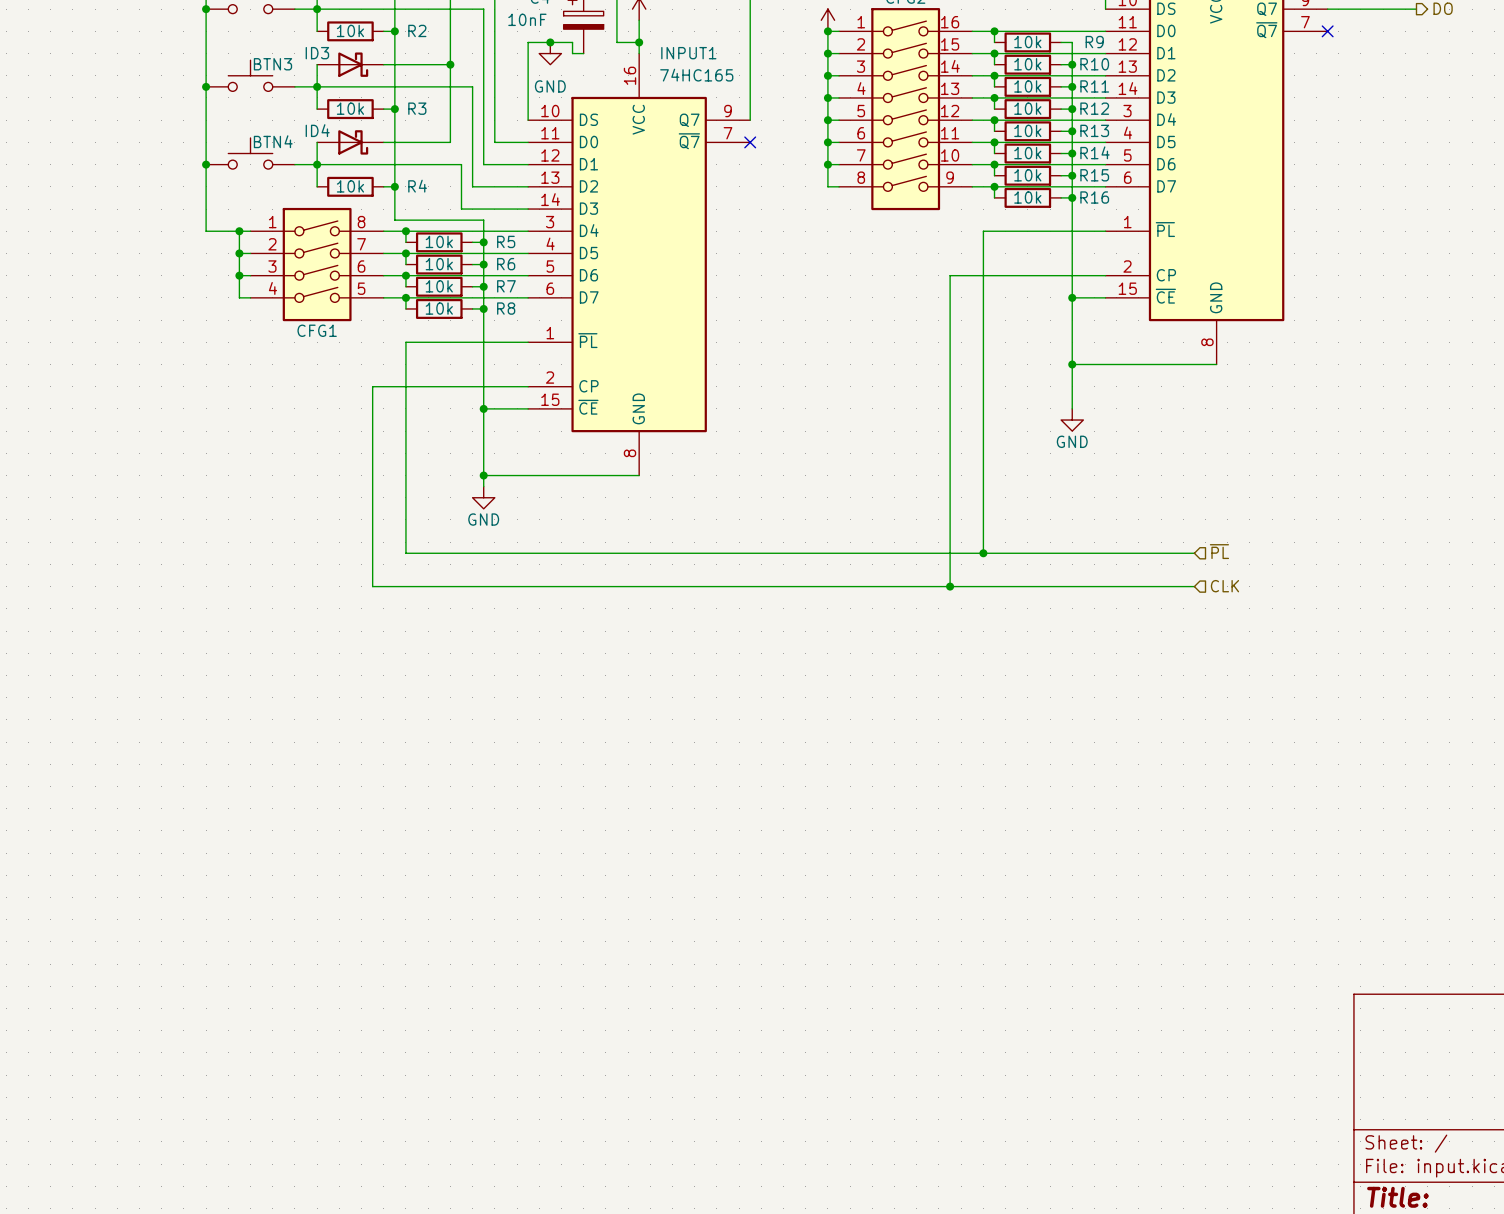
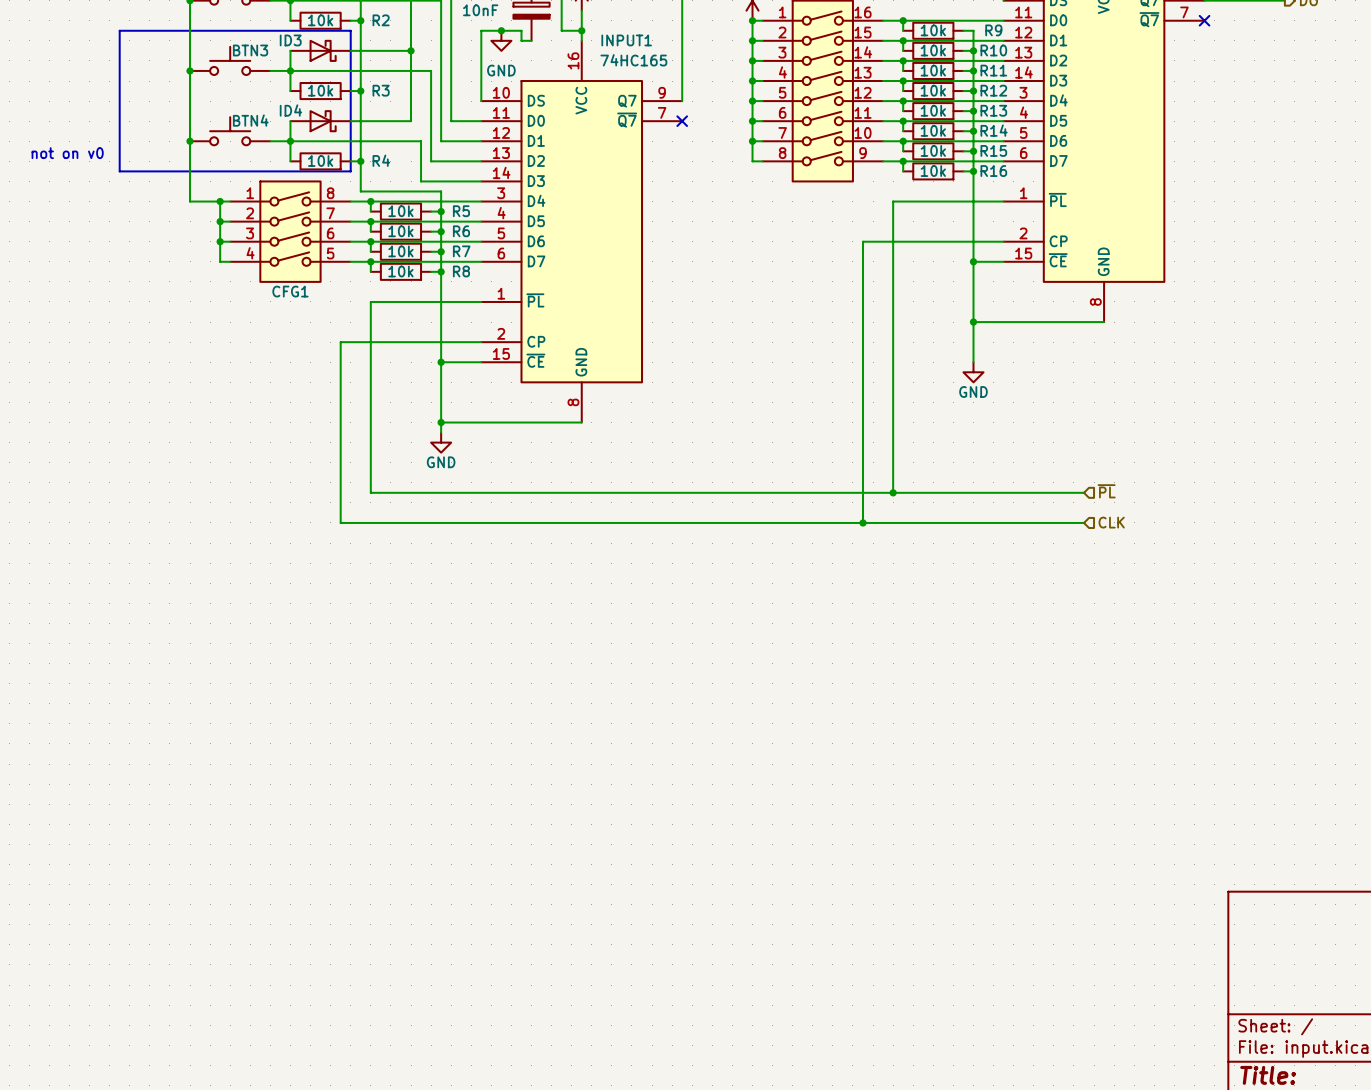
line: none -> (119, 30) (350, 30) (350, 171) (119, 171) (119, 30)
text: none -> not on v0 (67, 153)

